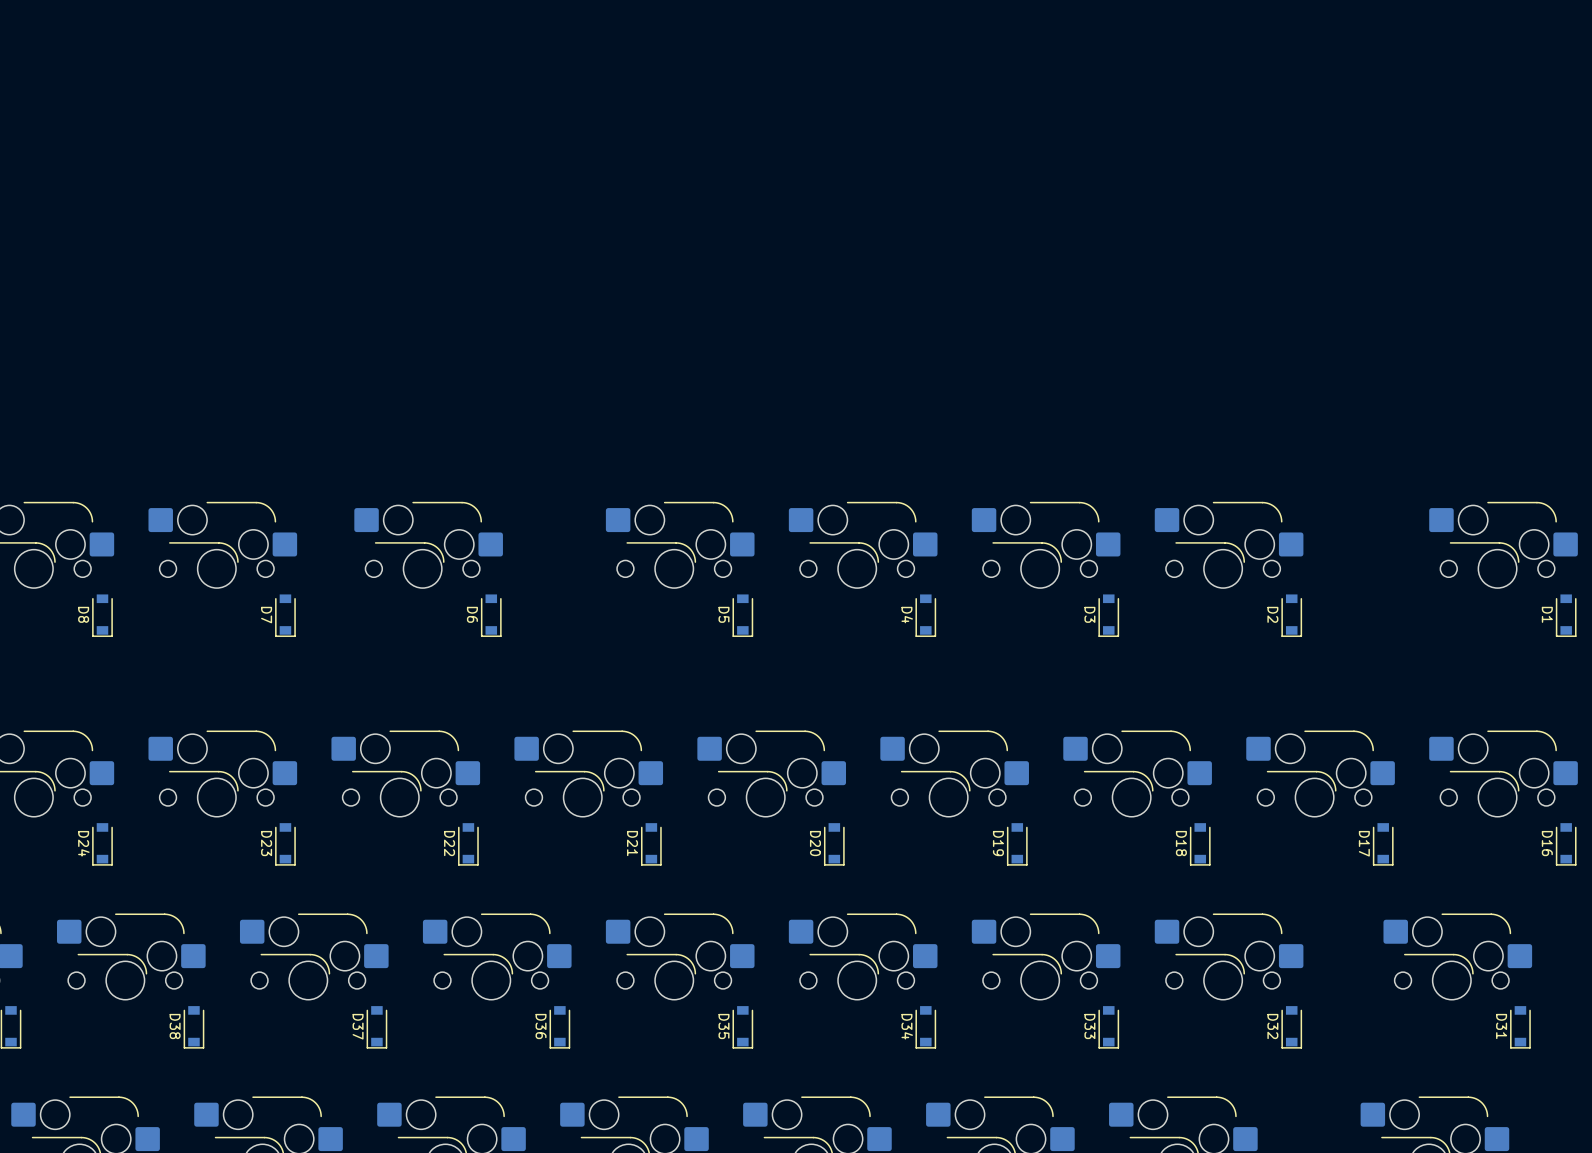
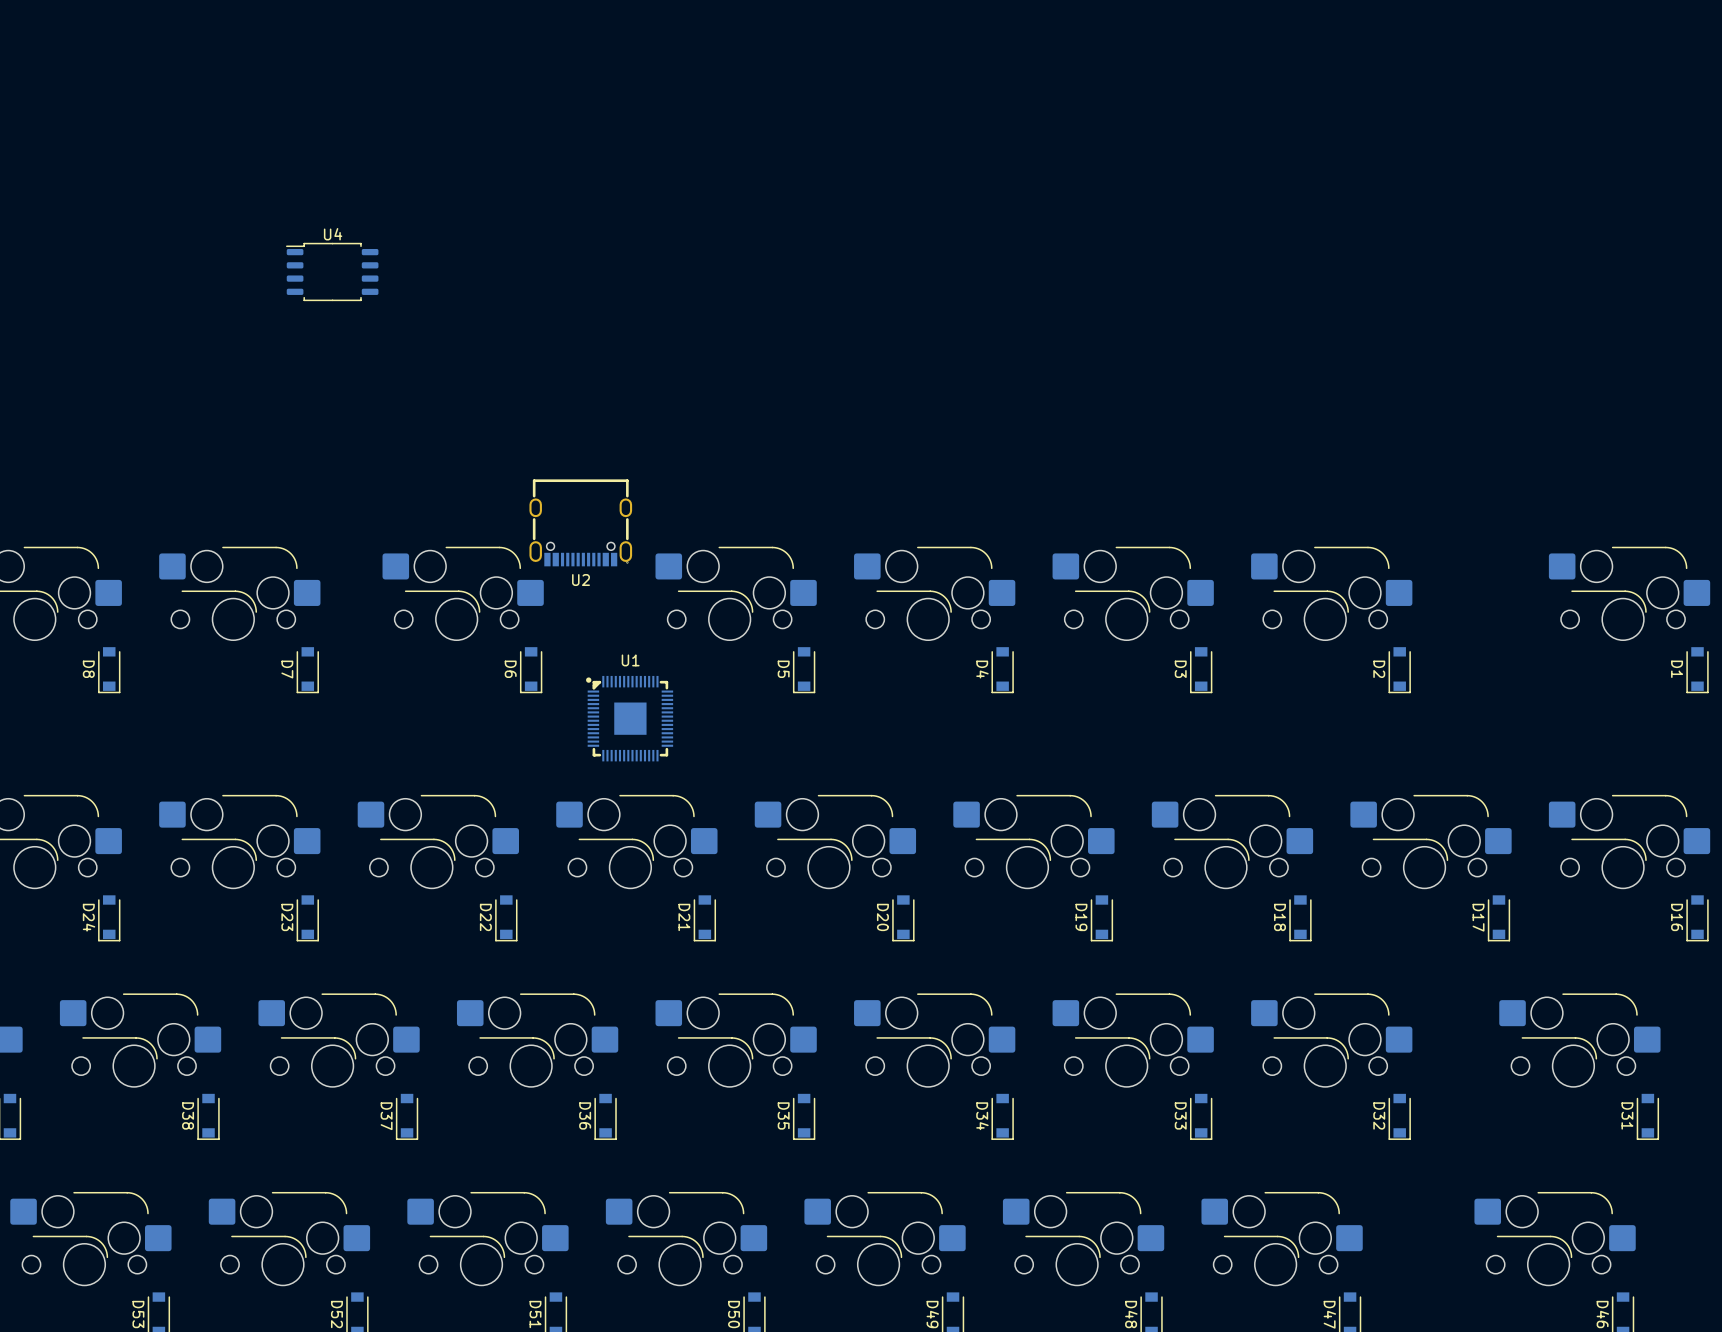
U4: none -> (332, 271)
U2: none -> (580, 522)
U1: none -> (629, 718)

